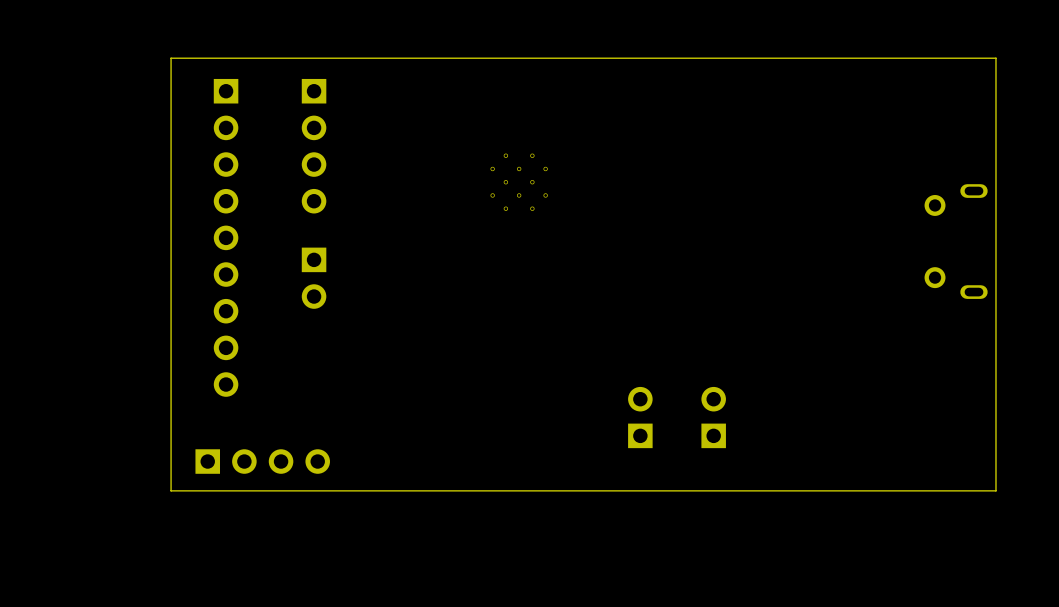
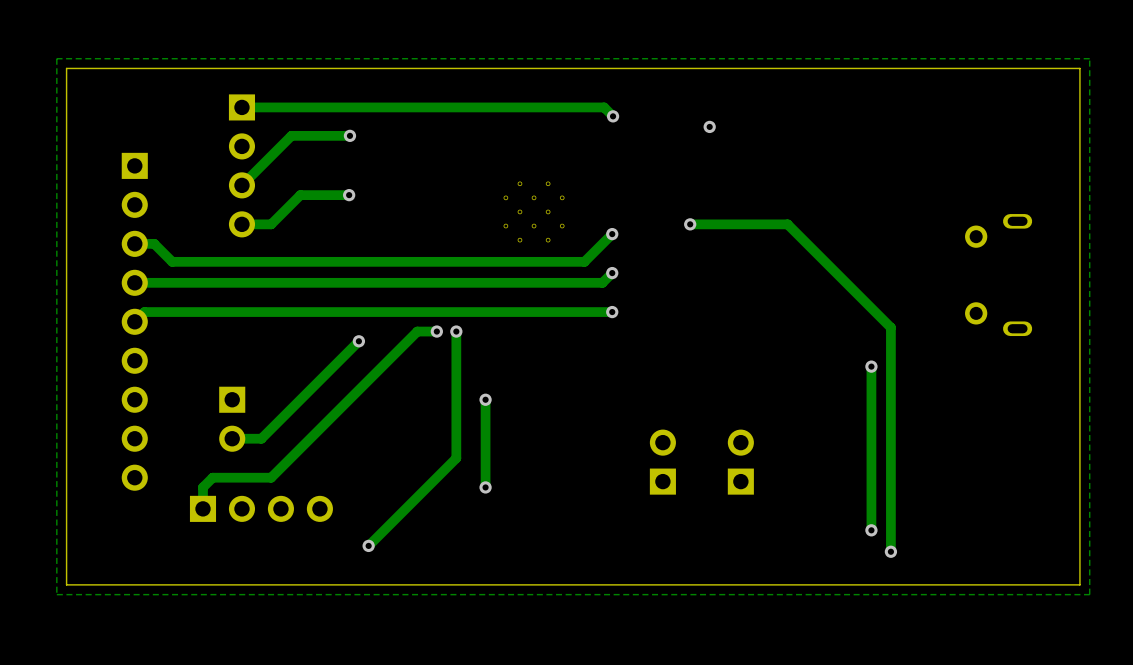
zone outline: none -> (1089, 58) (1089, 594) (56, 594) (56, 58) (1089, 58)
board edge: (995, 58) (171, 58) (171, 490) (995, 490) (995, 58) -> (1079, 68) (1079, 584) (66, 584) (66, 68) (1079, 68)
track: none -> (241, 107) (604, 107) (613, 116)
via: none -> (613, 116)
via: none -> (709, 126)
track: none -> (349, 135) (291, 135) (241, 185)
via: none -> (349, 135)
part position: (314, 146) -> (241, 165)
track: none -> (349, 195) (300, 195) (271, 224) (241, 224)
via: none -> (349, 195)
track: none -> (690, 224) (787, 224) (890, 327) (890, 551)
via: none -> (690, 224)
track: none -> (612, 234) (584, 261) (172, 261) (154, 243) (134, 243) (134, 252)
via: none -> (612, 234)
part position: (226, 237) -> (134, 321)
track: none -> (612, 273) (602, 282) (134, 282)
via: none -> (612, 273)
track: none -> (612, 312) (144, 312) (134, 321)
via: none -> (612, 312)
part position: (314, 278) -> (232, 419)
track: none -> (436, 331) (417, 331) (271, 477) (212, 477) (202, 487) (202, 508)
via: none -> (436, 331)
track: none -> (456, 331) (456, 458) (368, 545)
via: none -> (456, 331)
track: none -> (358, 341) (261, 438) (232, 438)
via: none -> (358, 341)
track: none -> (871, 366) (871, 530)
via: none -> (871, 366)
track: none -> (485, 399) (485, 487)
via: none -> (485, 399)
via: none -> (485, 487)
via: none -> (871, 530)
via: none -> (368, 545)
via: none -> (890, 551)

